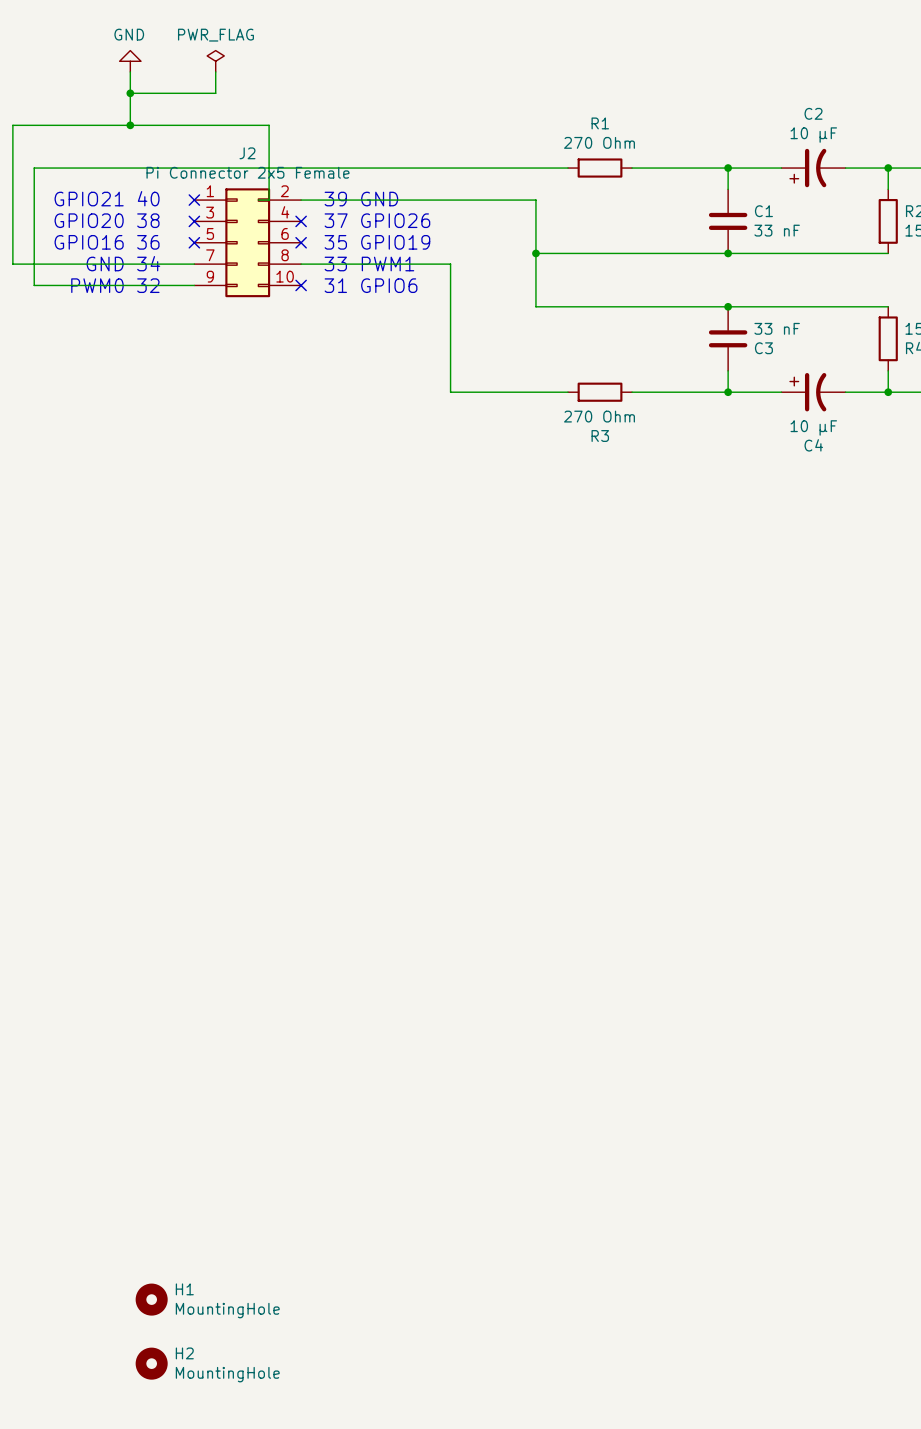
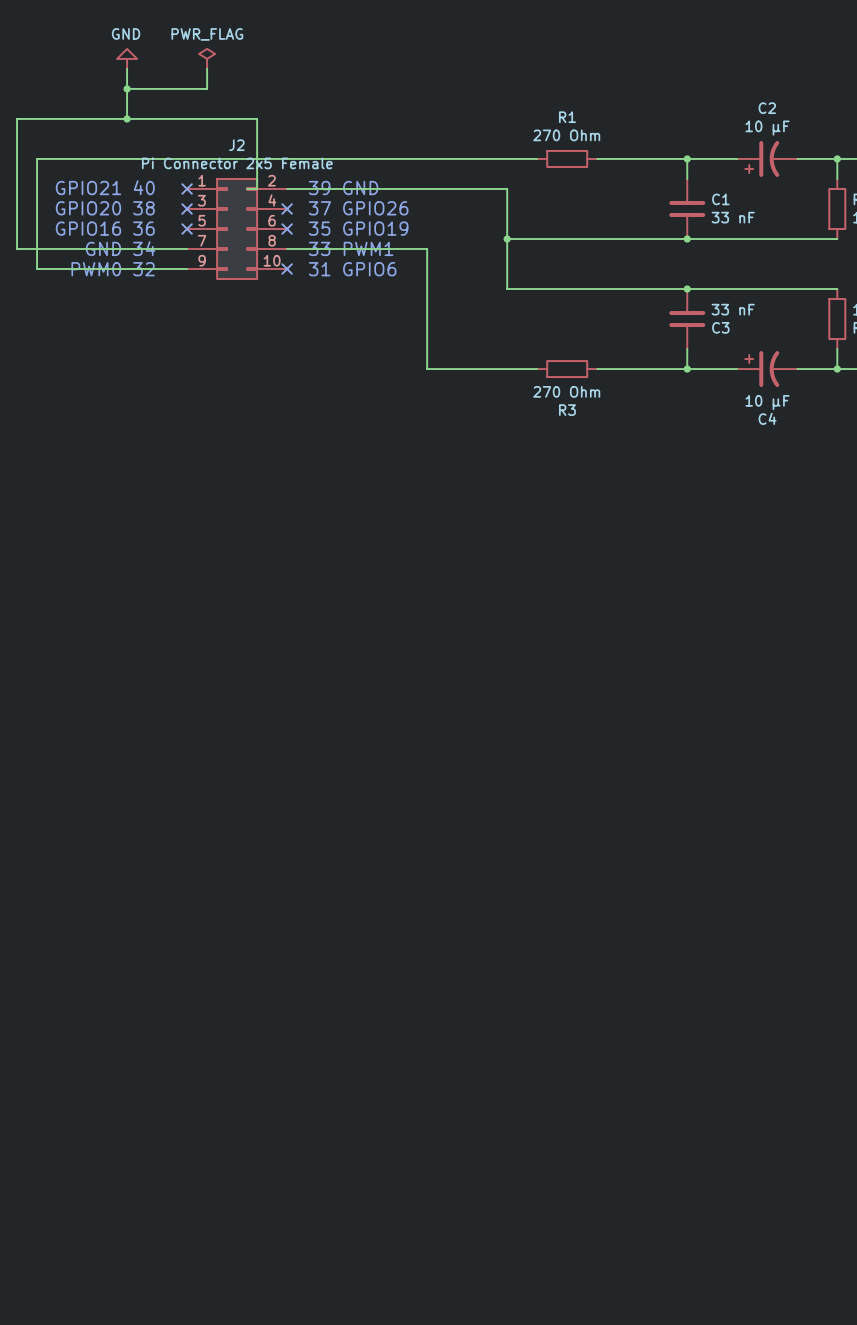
H1: MountingHole (151, 1299) -> none
H2: MountingHole (151, 1363) -> none

